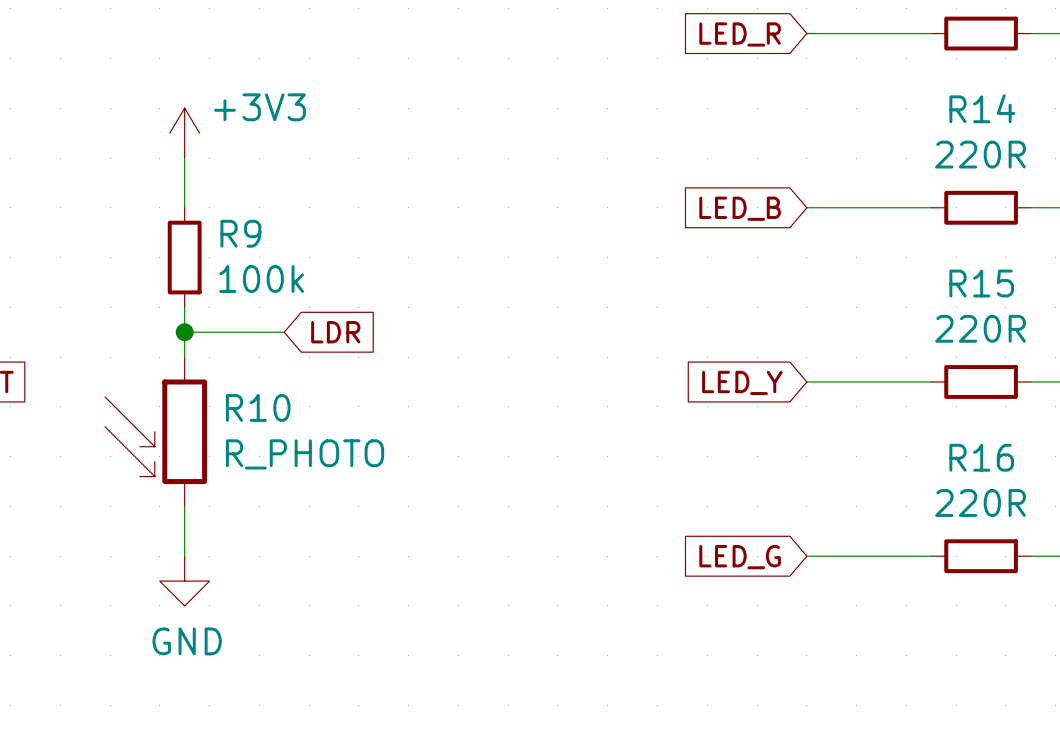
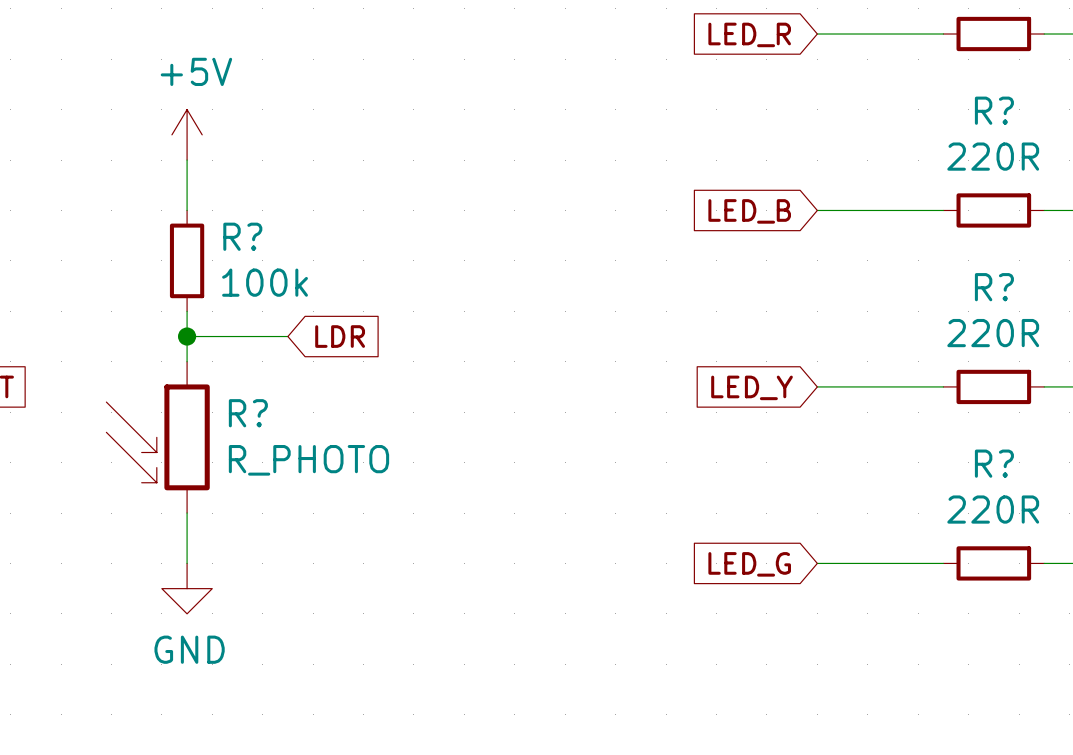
R14 name: R14 (982, 108) -> R? (994, 110)
power symbol: +3V3 (184, 133) -> +5V (187, 134)
R9 name: R9 (240, 233) -> R? (242, 236)
R15 name: R15 (981, 283) -> R? (994, 287)
R10 name: R10 (258, 407) -> R? (248, 413)
R16 name: R16 (981, 457) -> R? (994, 463)

